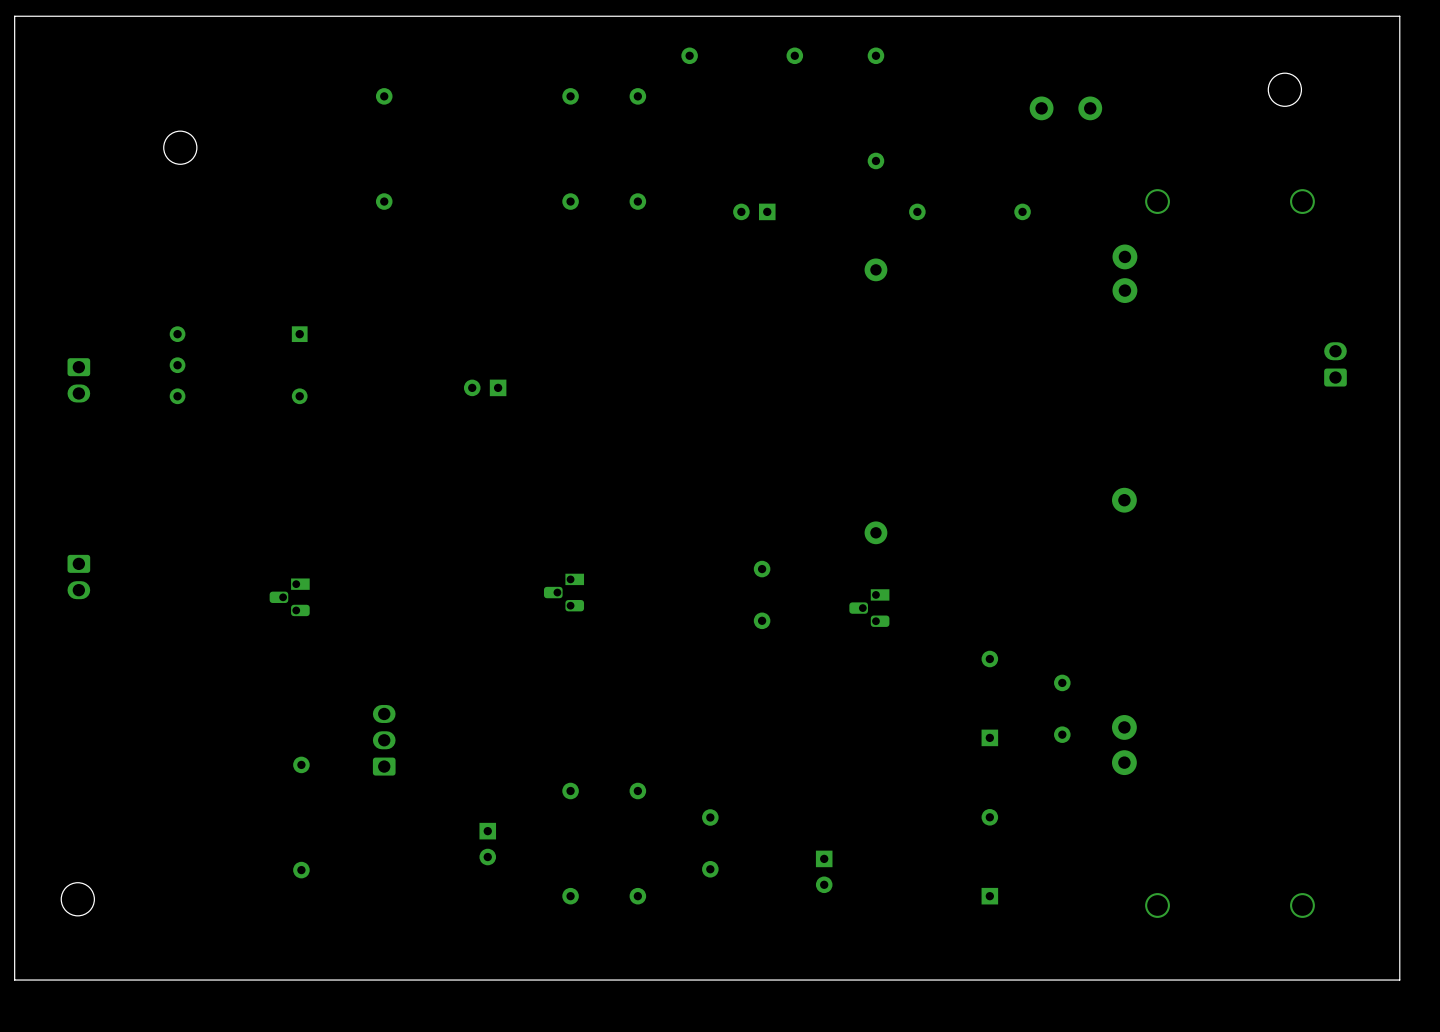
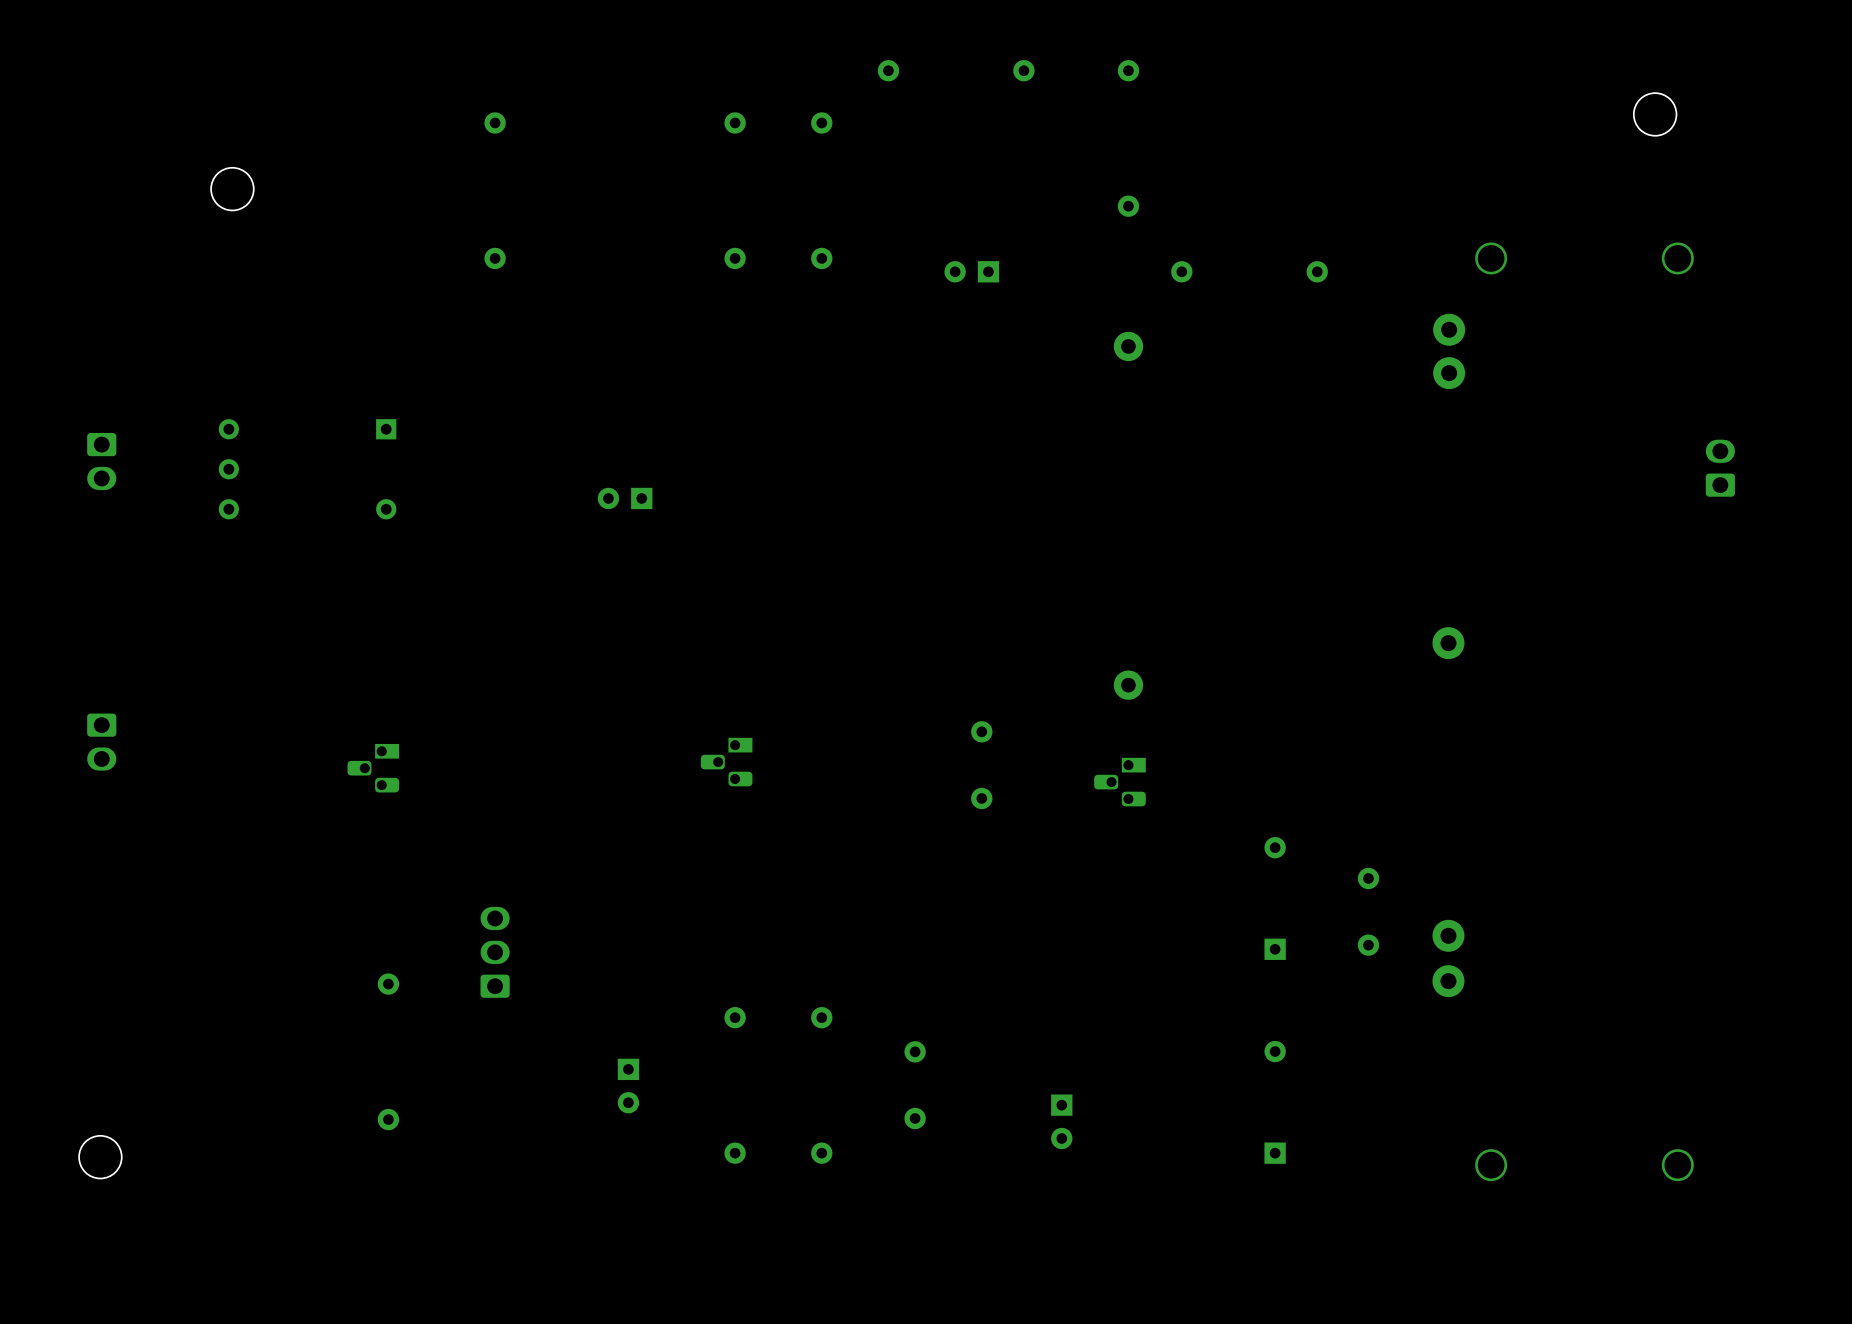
board edge: (1399, 16) (14, 16) (14, 980) (1399, 980) (1399, 16) -> none
part: (1065, 108) -> none
part position: (78, 380) -> (101, 461)

